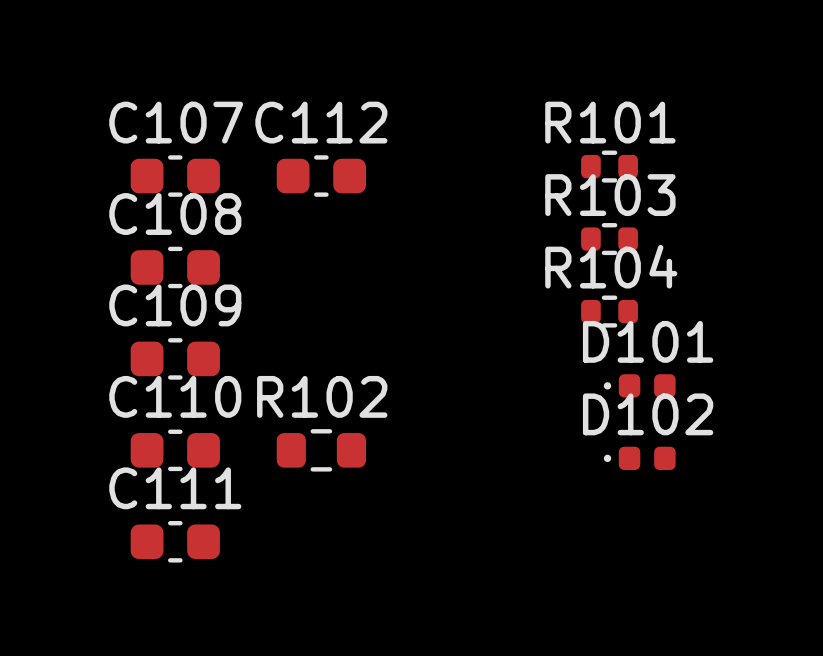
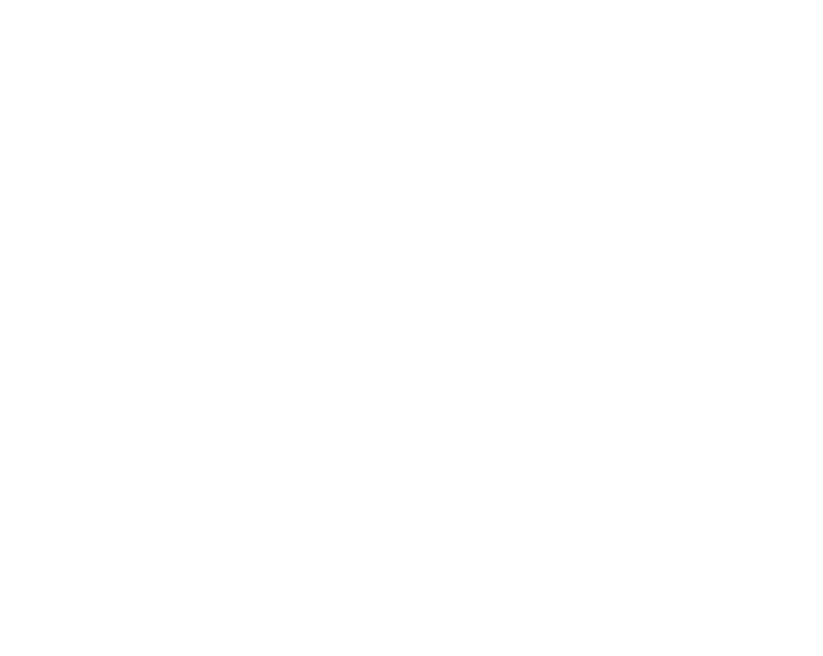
R101: (609, 166) -> none
C107: (175, 176) -> none
C112: (321, 176) -> none
R103: (609, 239) -> none
C108: (175, 267) -> none
R104: (609, 311) -> none
C109: (175, 358) -> none
D101: (639, 385) -> none
C110: (175, 450) -> none
R102: (321, 450) -> none
D102: (639, 458) -> none
C111: (175, 541) -> none

